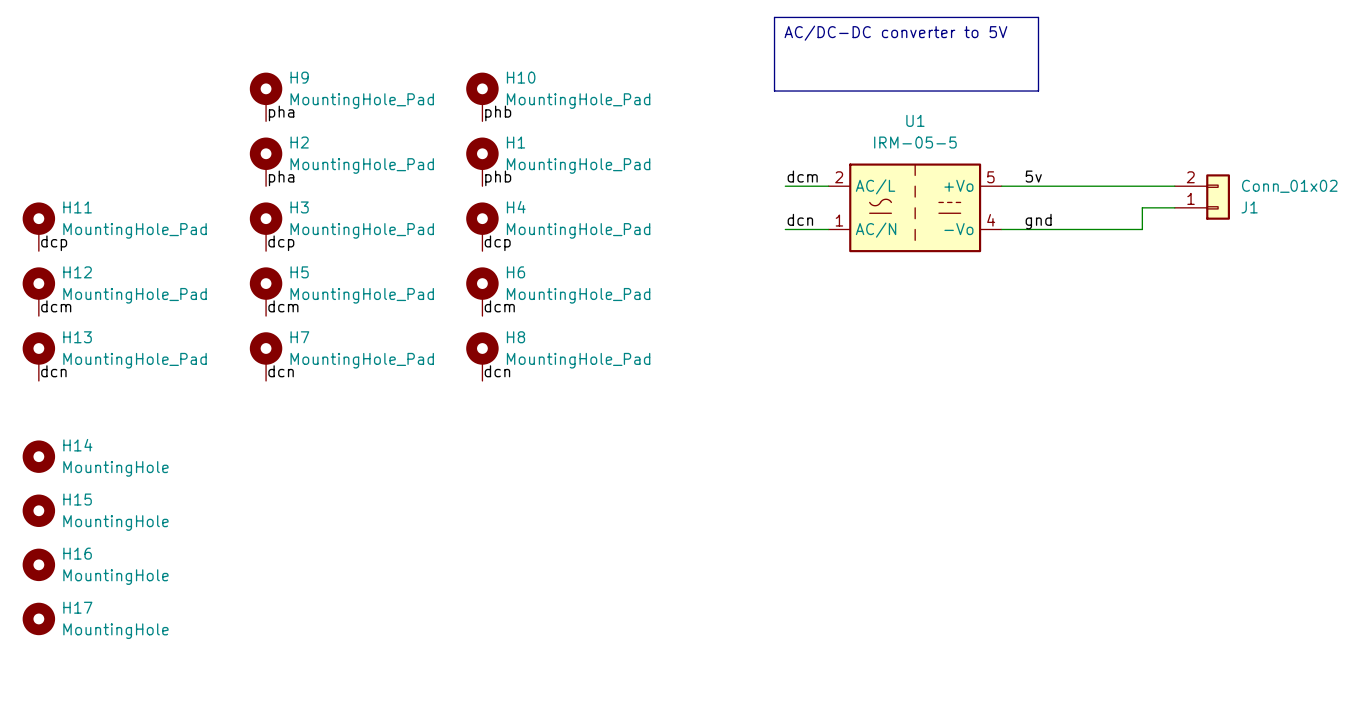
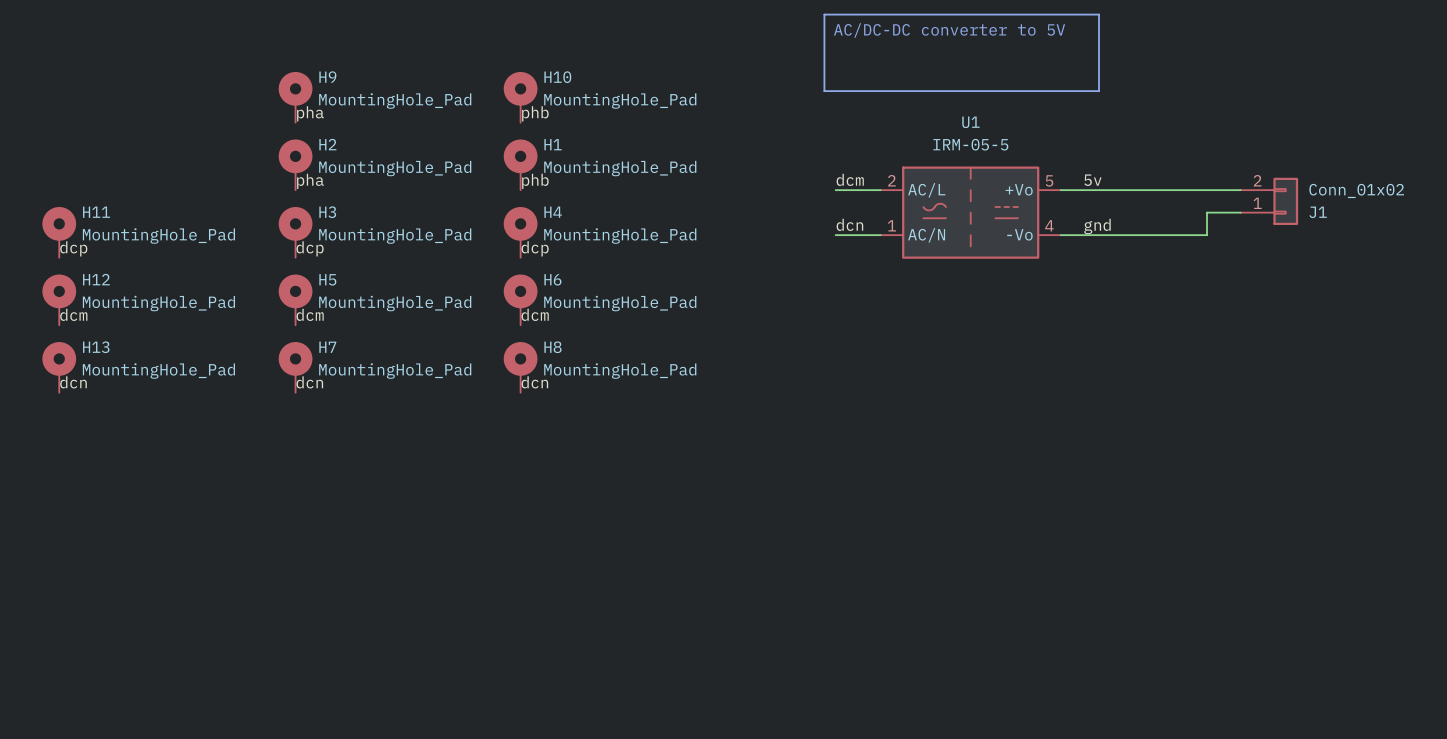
H14: MountingHole (38, 456) -> none
H15: MountingHole (38, 510) -> none
H16: MountingHole (38, 564) -> none
H17: MountingHole (38, 618) -> none

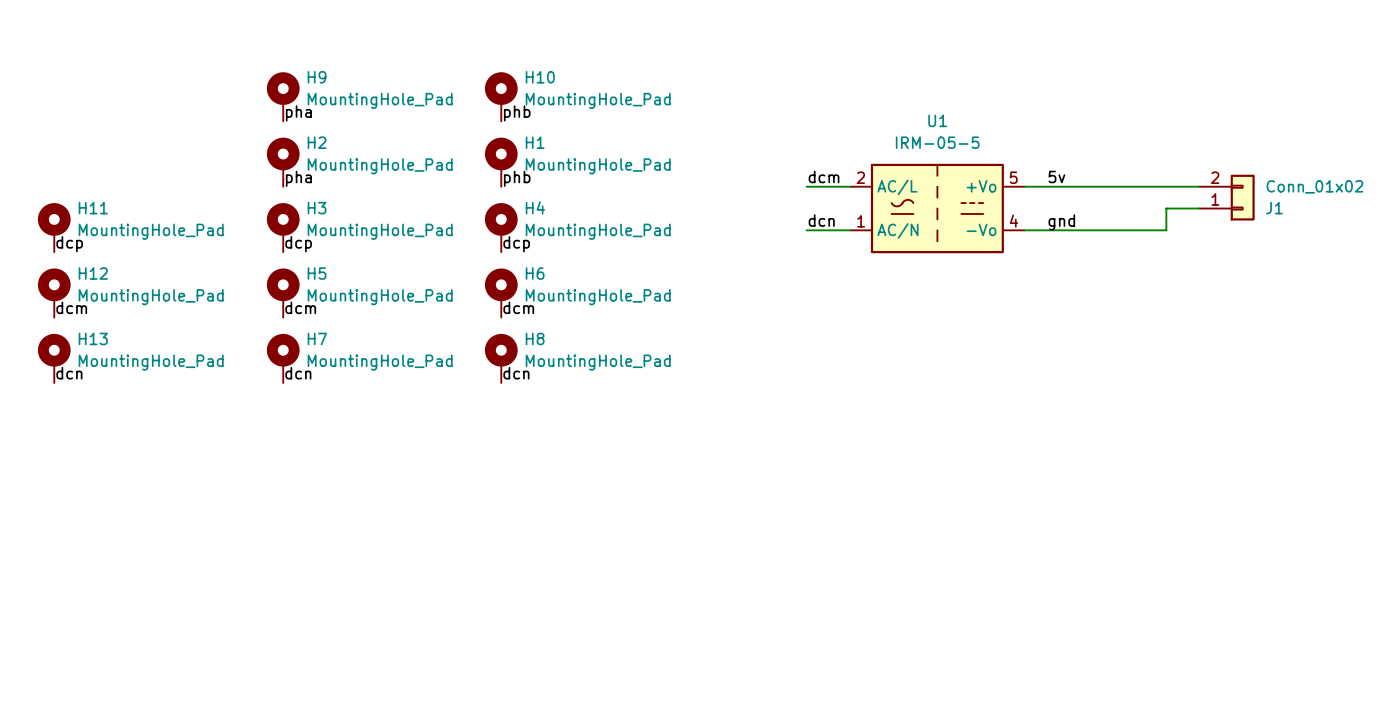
line: (824, 14) (1098, 14) (1098, 91) (824, 91) (824, 14) -> none
text: AC/DC-DC converter to 5V (949, 30) -> none

